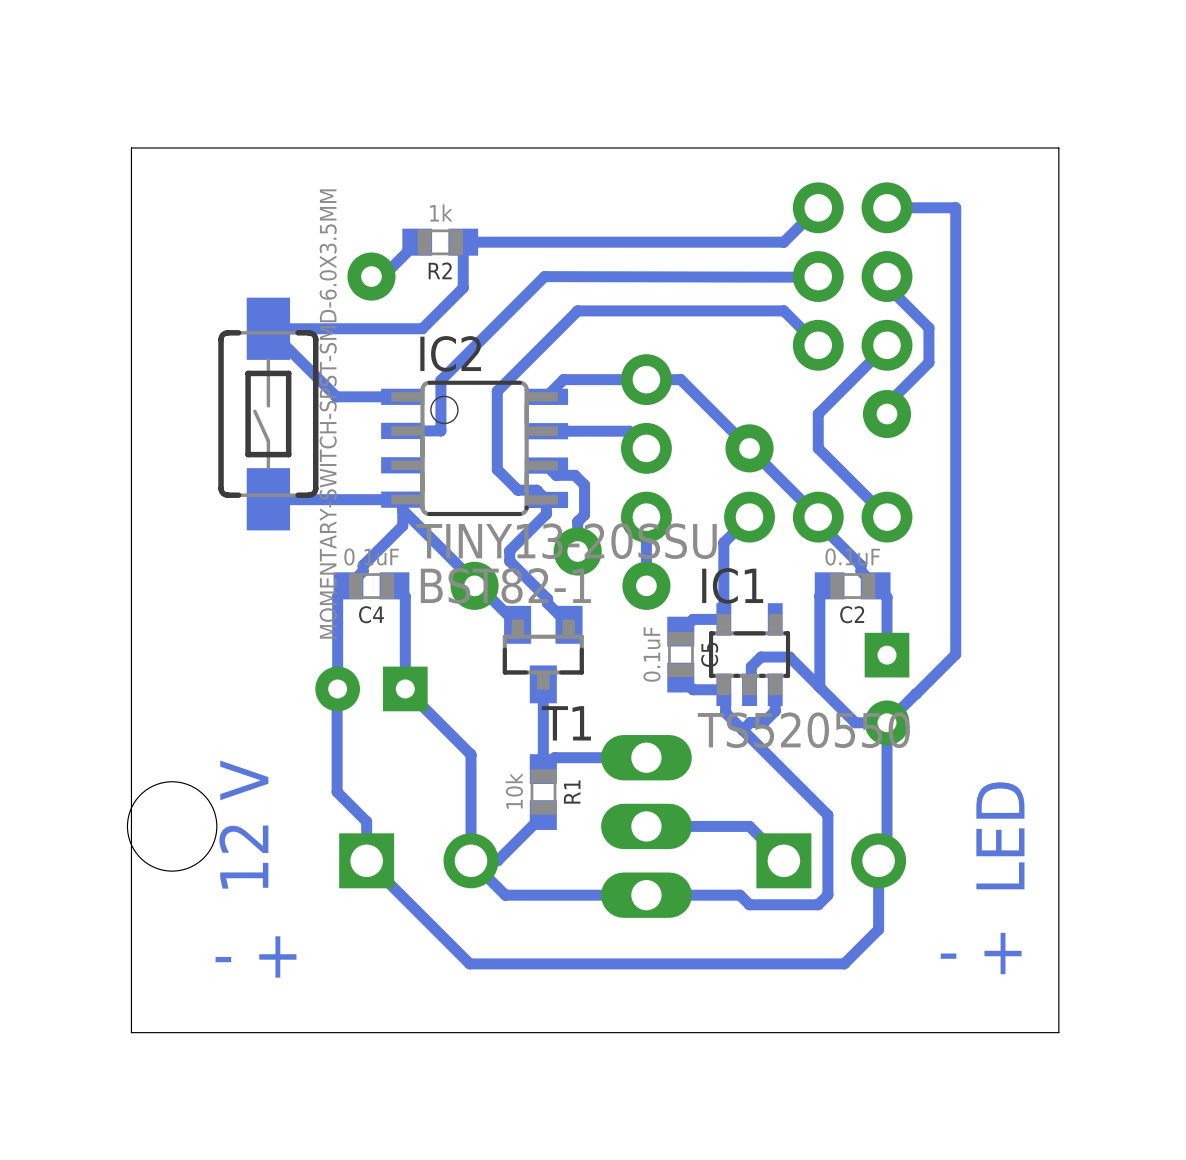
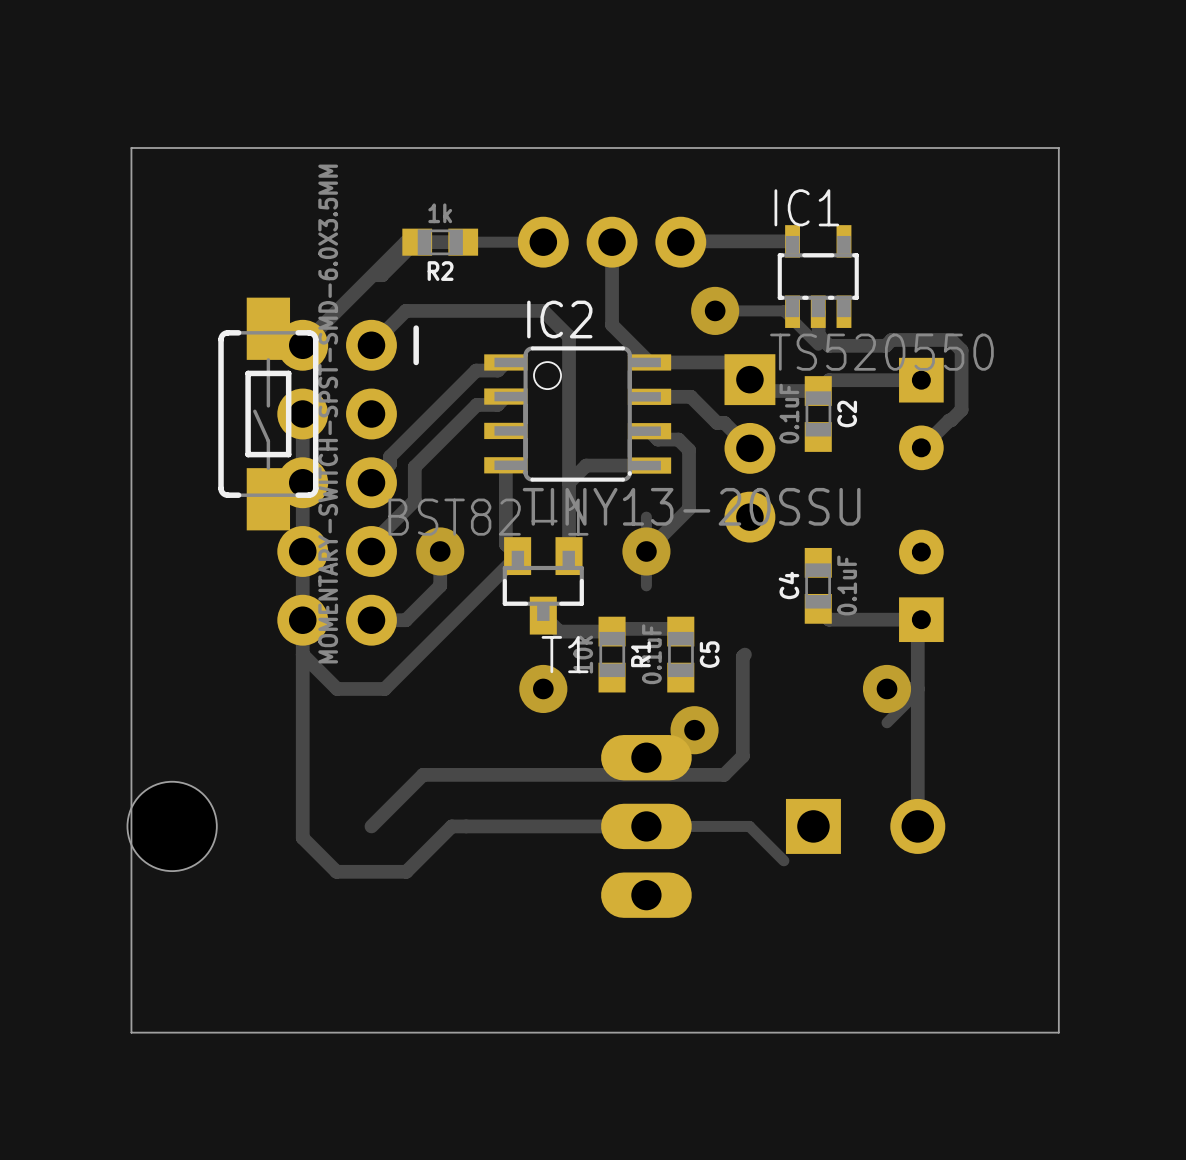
track: (818, 207) (783, 242) (543, 242) -> none
track: (887, 207) (955, 207) (955, 654) (916, 693) -> none
track: (463, 242) (463, 287) (422, 328) (268, 328) (336, 396) (402, 396) -> (463, 242) (405, 242) (302, 345)
track: none -> (612, 242) (612, 325) (649, 362) (732, 362) (761, 391) (818, 391) (829, 380) (921, 380)
part: none -> (612, 242)
track: none -> (791, 242) (680, 242)
via: (371, 276) -> none
track: (818, 276) (544, 276) (440, 380) (440, 430) (402, 430) -> none
part: (852, 276) -> none
track: (887, 276) (887, 285) (928, 327) (928, 362) (887, 404) (887, 414) -> none
track: (715, 310) (577, 310) (497, 391) (497, 469) (517, 490) (536, 490) (546, 499) (546, 514) (509, 551) -> none
via: none -> (715, 310)
track: none -> (820, 313) (818, 311) (818, 335) (829, 345) (885, 345) (891, 339) (951, 339) (961, 350) (961, 409) (921, 448)
track: none -> (371, 345) (405, 310) (543, 310) (569, 336) (569, 556)
track: (887, 345) (818, 414) (818, 448) (887, 517) -> none
track: none -> (505, 362) (497, 370) (476, 370) (390, 456) (390, 464) (371, 482)
track: none -> (505, 396) (497, 404) (476, 404) (414, 466) (414, 500) (371, 543) (371, 551) (371, 546)
track: (546, 396) (563, 379) (680, 379) (818, 517) (818, 522) (861, 565) (861, 571) (887, 597) (887, 655) -> none
track: none -> (649, 396) (690, 396) (717, 422) (724, 422) (749, 448)
track: none -> (302, 414) (302, 837) (336, 871) (406, 871) (451, 826) (646, 826)
via: (887, 414) -> none
part: none -> (921, 414)
track: (546, 431) (629, 431) (646, 448) -> none
track: none -> (649, 431) (657, 439) (678, 439) (689, 450) (689, 508) (646, 551)
IC2 position: (474, 448) -> (577, 414)
part: (646, 448) -> none
part: none -> (749, 448)
via: (749, 448) -> none
track: none -> (505, 465) (505, 544) (517, 556) (384, 688) (337, 688) (302, 654)
track: (546, 465) (556, 475) (574, 475) (584, 484) (584, 514) (577, 521) (577, 551) -> none
track: none -> (649, 465) (586, 465) (569, 482)
part: none -> (348, 482)
track: (402, 509) (517, 624) -> none
track: (268, 517) (285, 499) (402, 499) (402, 525) (363, 565) (363, 571) (337, 596) (337, 792) (366, 821) (366, 860) (469, 963) (844, 963) (878, 929) (878, 860) (887, 852) (887, 722) (855, 722) (789, 657) (760, 657) (751, 666) (751, 688) (749, 689) -> none
track: (749, 517) (723, 542) (723, 619) (692, 619) (680, 631) -> none
part: (818, 517) -> none
track: none -> (440, 551) (440, 585) (405, 620) (371, 620)
track: (509, 551) (509, 561) (547, 599) (547, 603) (569, 624) -> none
via: (577, 551) -> none
via: none -> (646, 551)
C4 rotation: 0° (371, 585) -> 90° clockwise (818, 585)
C4 position: (371, 585) -> (818, 585)
track: (394, 585) (405, 596) (405, 688) (471, 754) (471, 860) -> none
via position: (474, 585) -> (440, 551)
via: (646, 585) -> none
track: (829, 585) (819, 595) (819, 687) -> none
C2 rotation: 0° (852, 585) -> 90° clockwise (818, 414)
C2 position: (852, 585) -> (818, 414)
track: none -> (818, 608) (829, 619) (921, 619) (917, 623) (917, 826)
track: none -> (543, 615) (559, 631) (612, 631) (614, 628) (685, 628)
T1 position: (543, 654) -> (543, 585)
track: none -> (744, 654) (742, 656) (742, 756) (724, 774) (423, 774) (371, 826)
IC1 position: (749, 654) -> (818, 276)
track: (680, 677) (692, 689) (723, 689) (725, 691) (725, 712) (827, 815) (827, 895) (818, 904) (749, 904) (739, 895) (505, 895) (471, 860) -> none
track: (543, 684) (543, 769) (554, 757) (646, 757) -> none
part: (371, 688) -> none
via: none -> (543, 688)
part rotation: 0° (887, 688) -> 180° (921, 585)
part position: (887, 688) -> (921, 585)
via: none -> (887, 688)
track: (775, 689) (775, 711) (763, 722) (750, 722) (742, 730) -> none
via: none -> (694, 730)
R1 position: (543, 792) -> (612, 654)
track: (543, 815) (497, 860) (471, 860) -> none
text: 12 V (243, 824) -> none
text: LED (1000, 835) -> none
part position: (418, 860) -> (865, 826)
part: (831, 860) -> none
text: - + (981, 953) -> none
text: - + (256, 956) -> none

